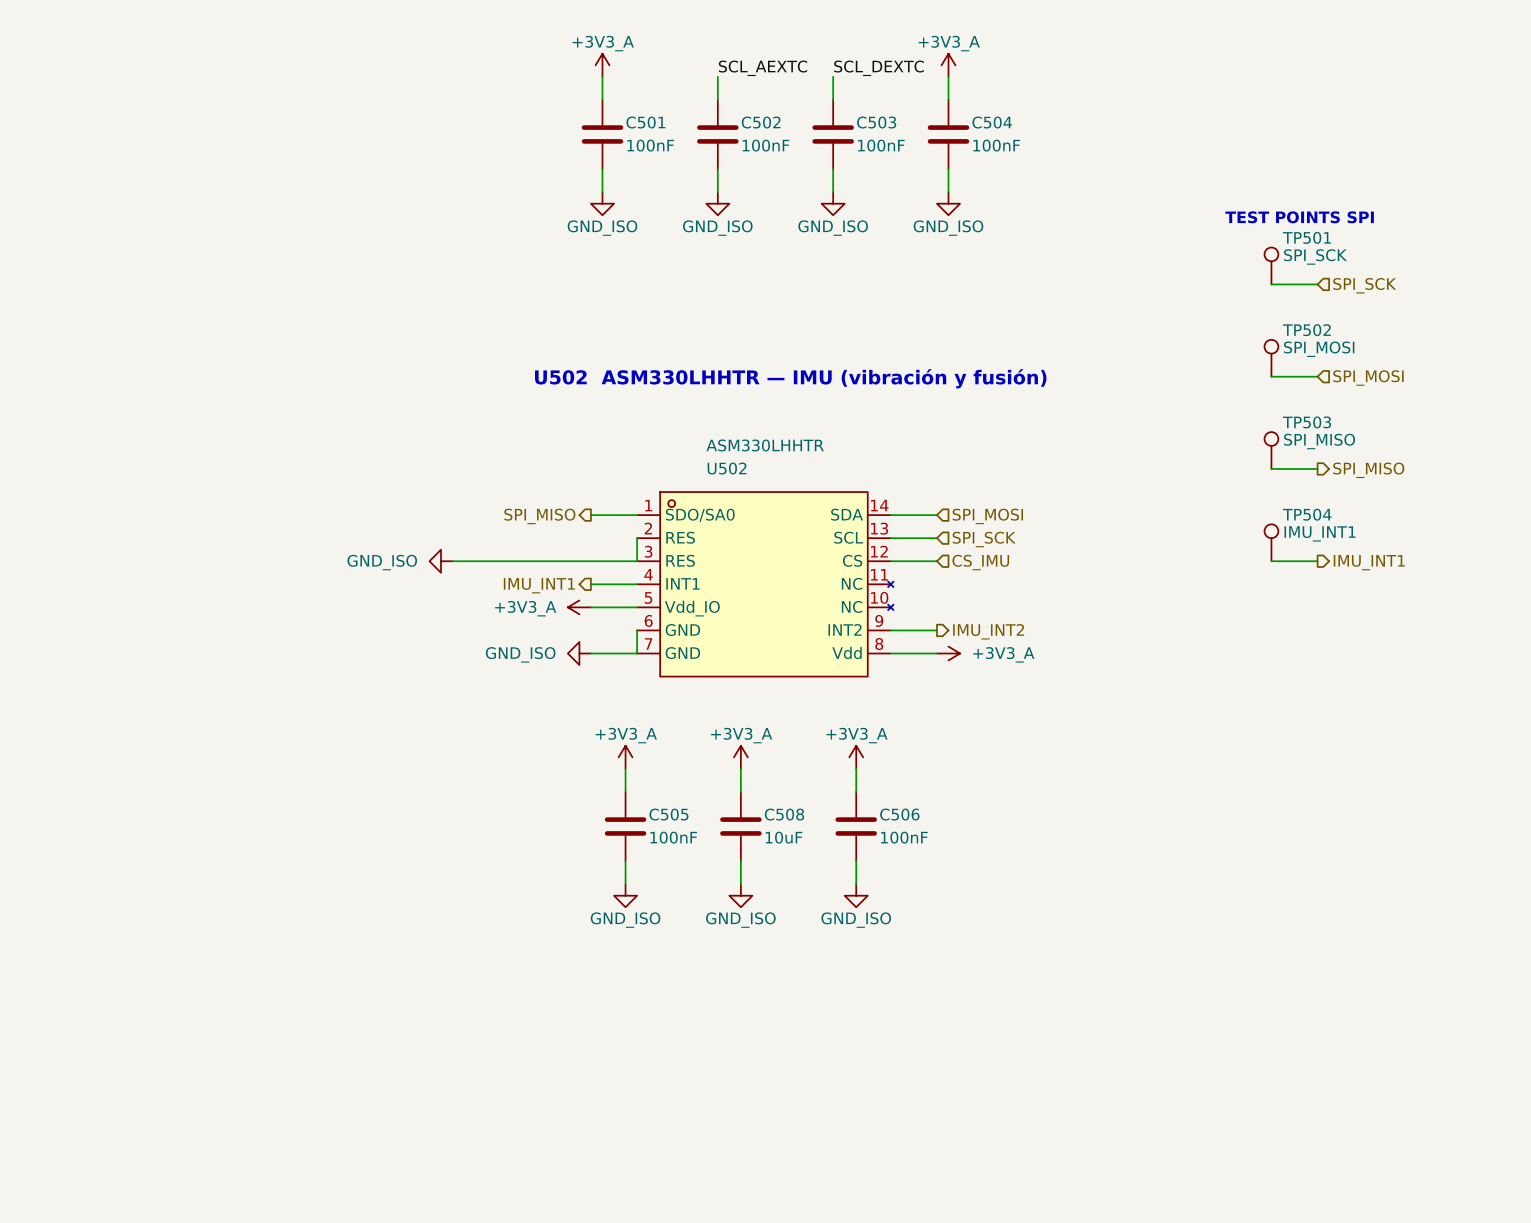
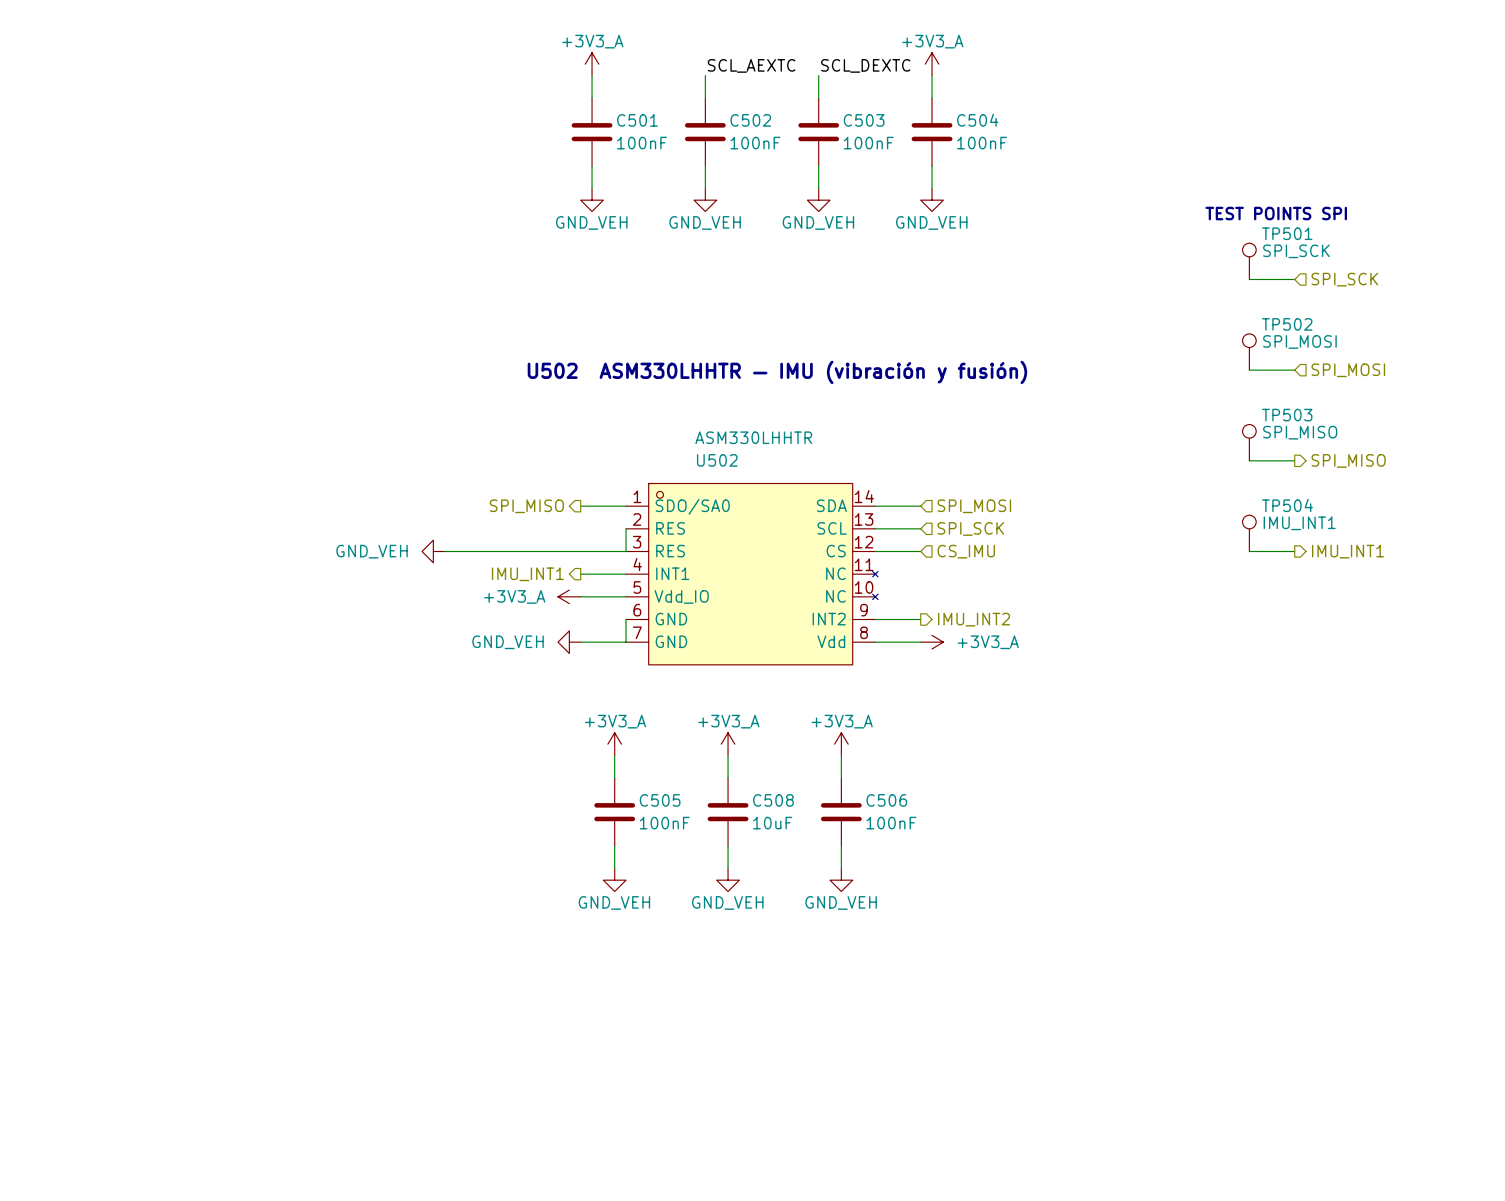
power symbol: GND_ISO (602, 203) -> GND_VEH (592, 200)
power symbol: GND_ISO (717, 203) -> GND_VEH (705, 200)
power symbol: GND_ISO (833, 203) -> GND_VEH (818, 200)
power symbol: GND_ISO (948, 203) -> GND_VEH (932, 200)
power symbol: GND_ISO (441, 561) -> GND_VEH (433, 551)
power symbol: GND_ISO (579, 653) -> GND_VEH (569, 642)
power symbol: GND_ISO (625, 895) -> GND_VEH (614, 880)
power symbol: GND_ISO (740, 895) -> GND_VEH (728, 880)
power symbol: GND_ISO (856, 895) -> GND_VEH (841, 880)

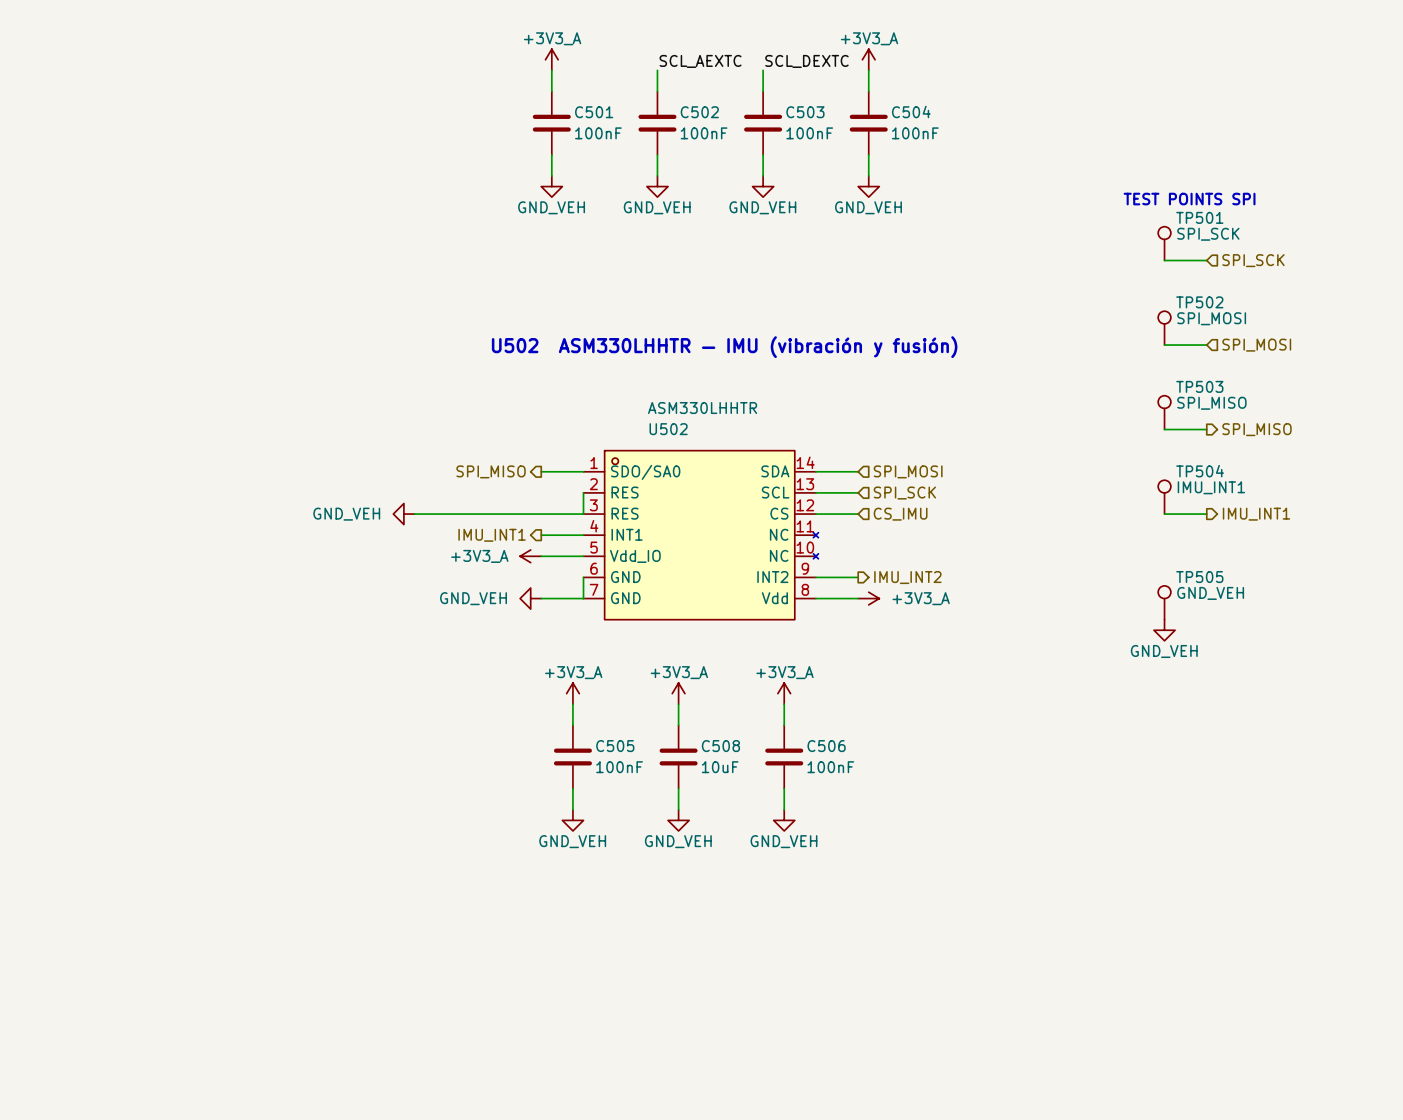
TP505: none -> GND_VEH (1164, 602)
power symbol: none -> GND_VEH (1164, 630)

